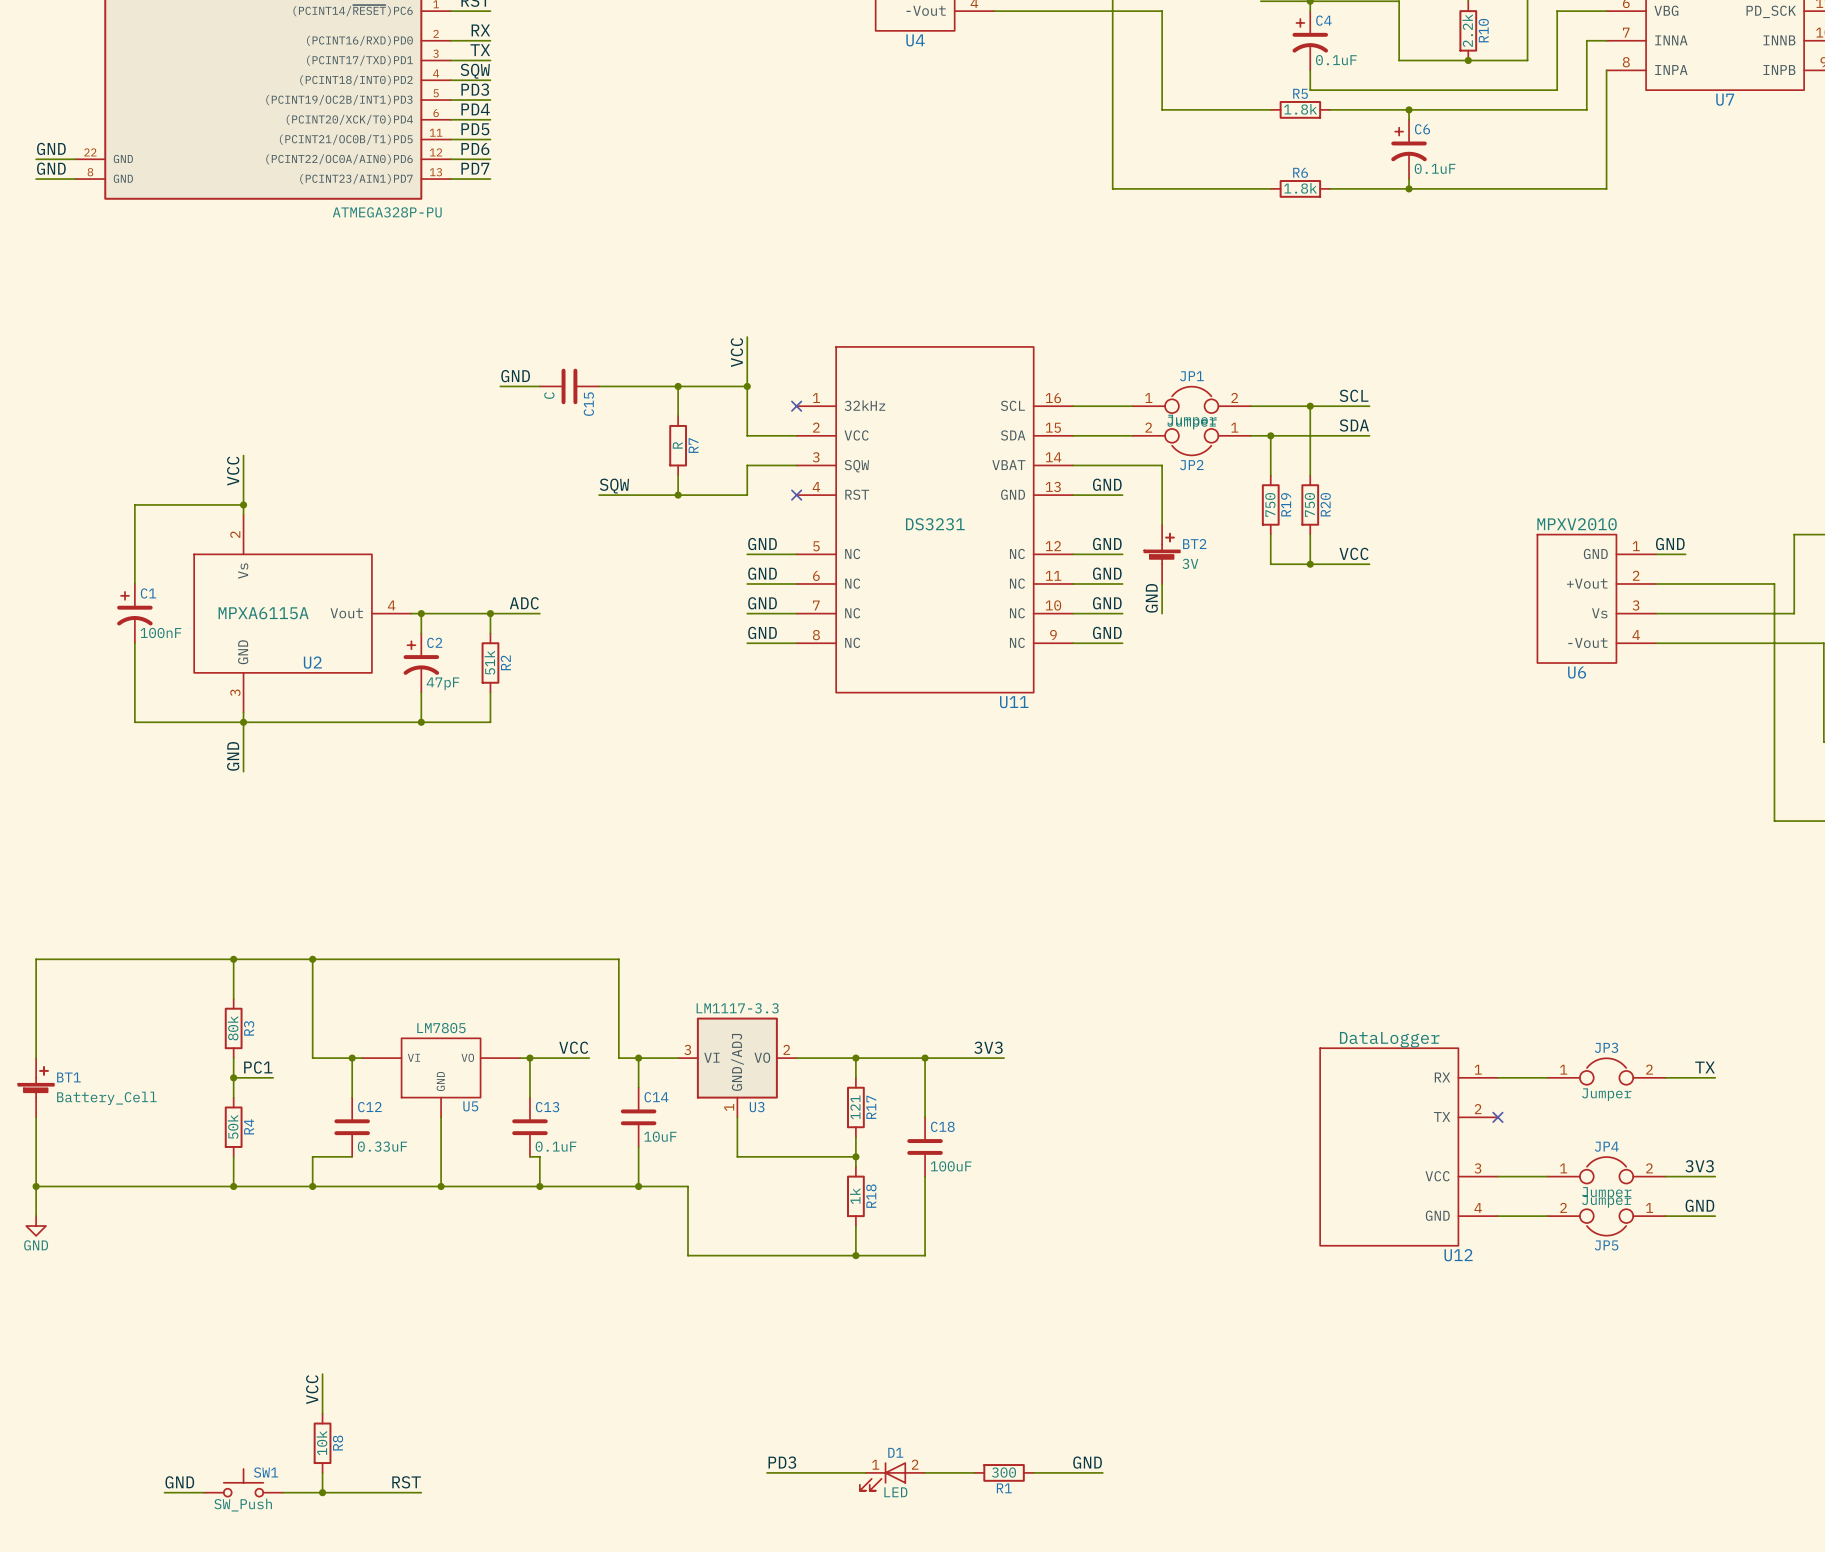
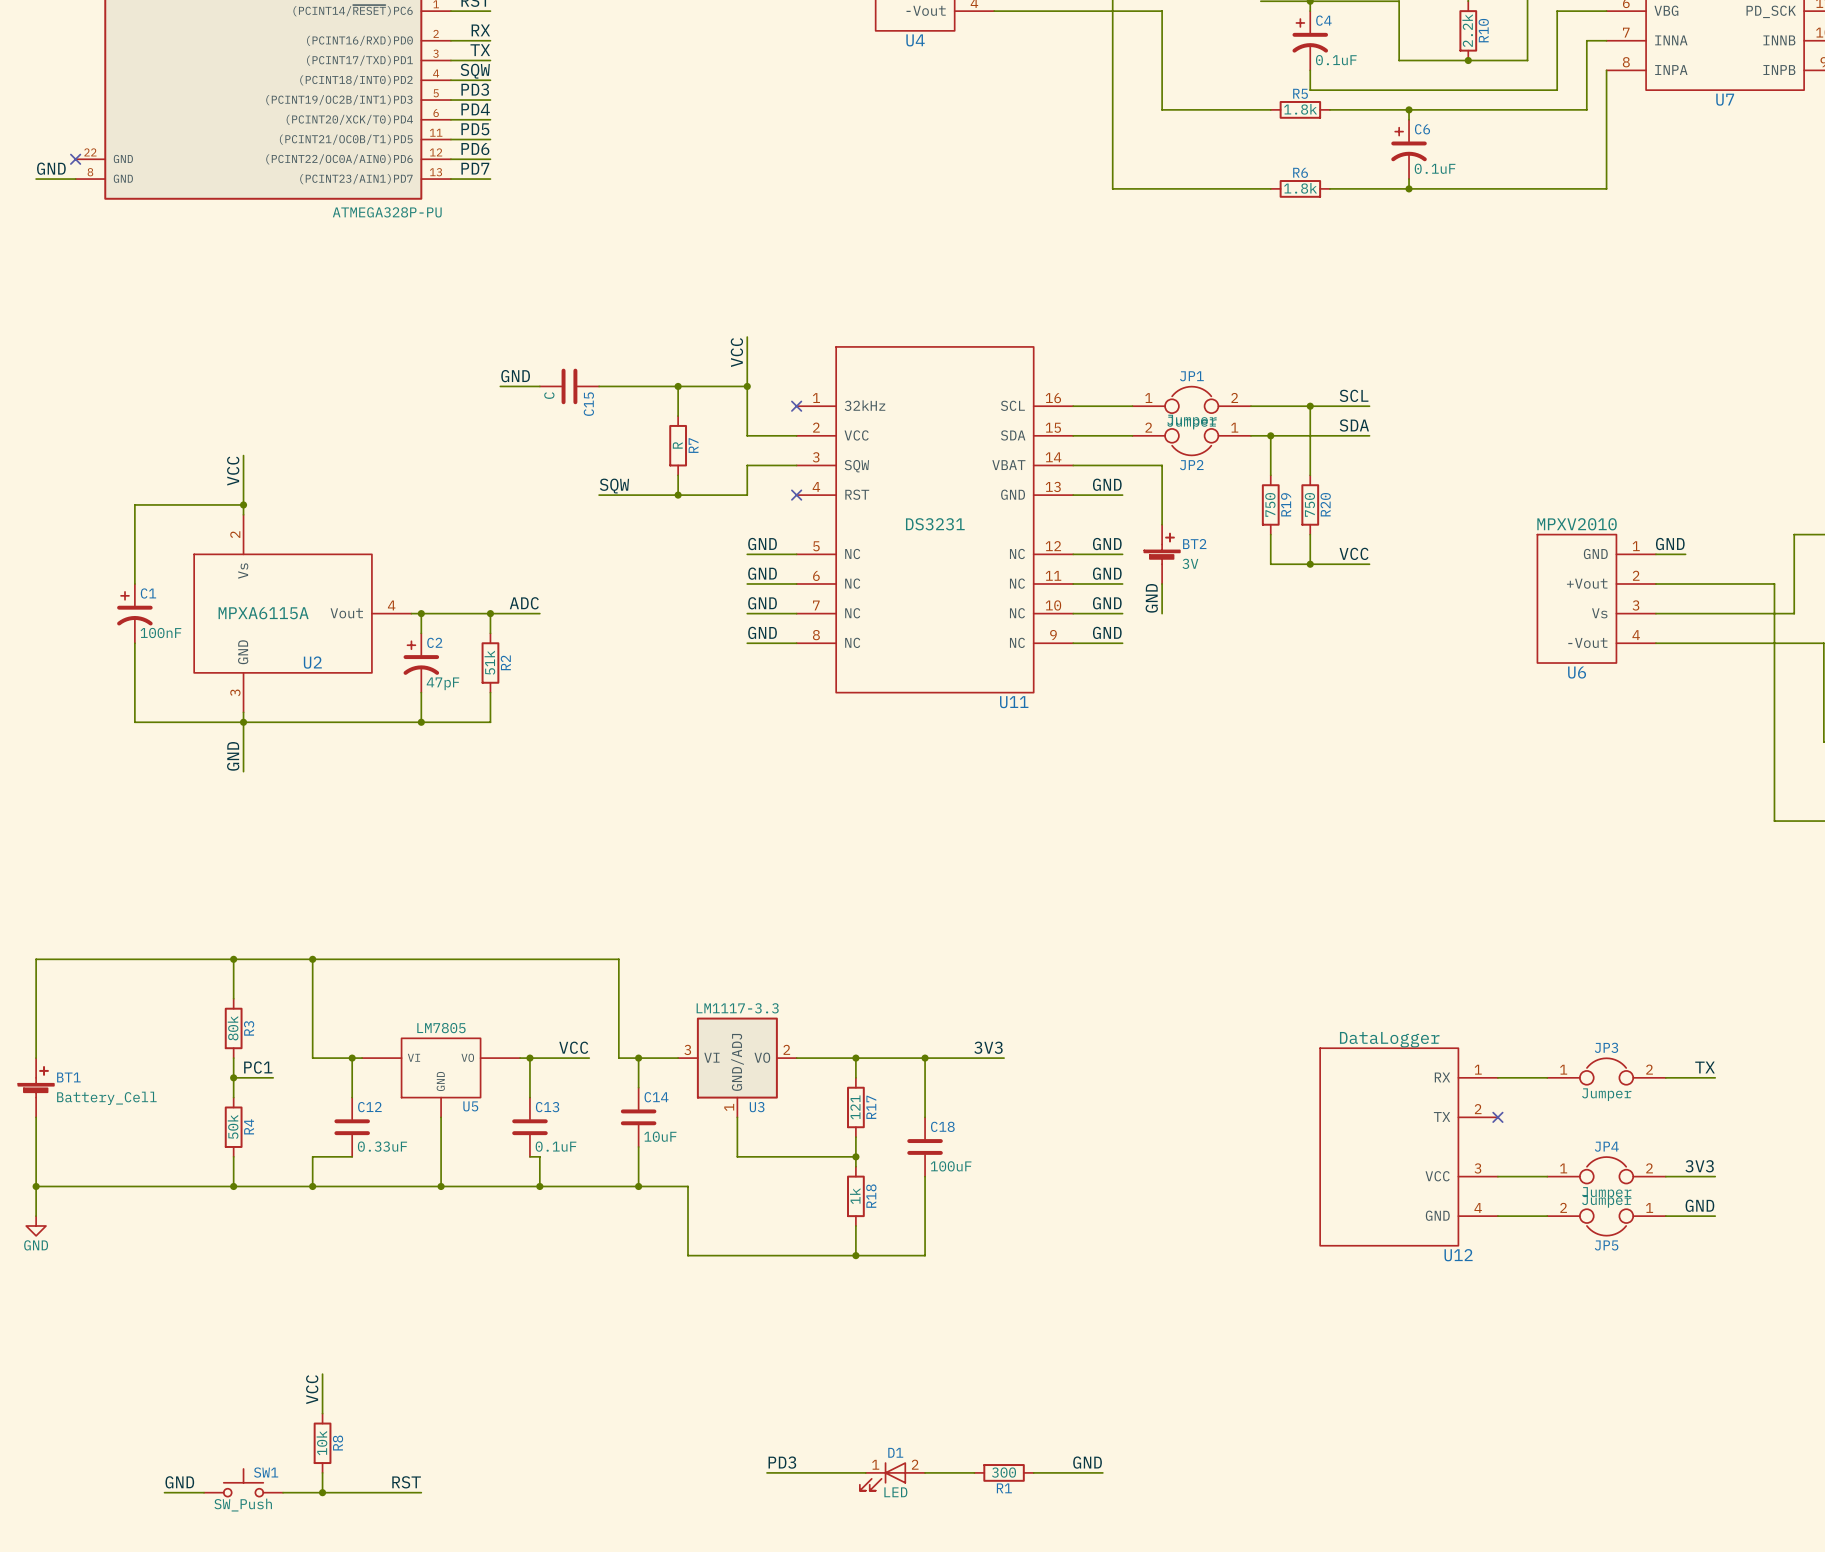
label: GND (51, 148) -> none
wire: (36, 159) (75, 159) -> none
no-connect mark: none -> (75, 159)

